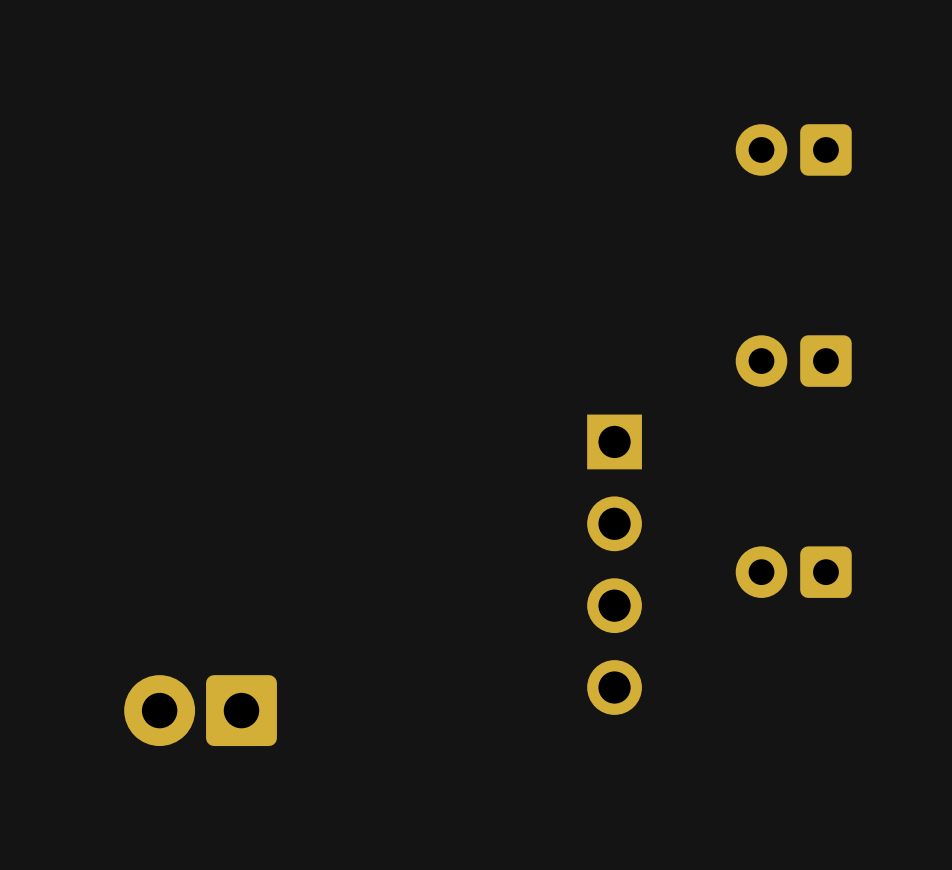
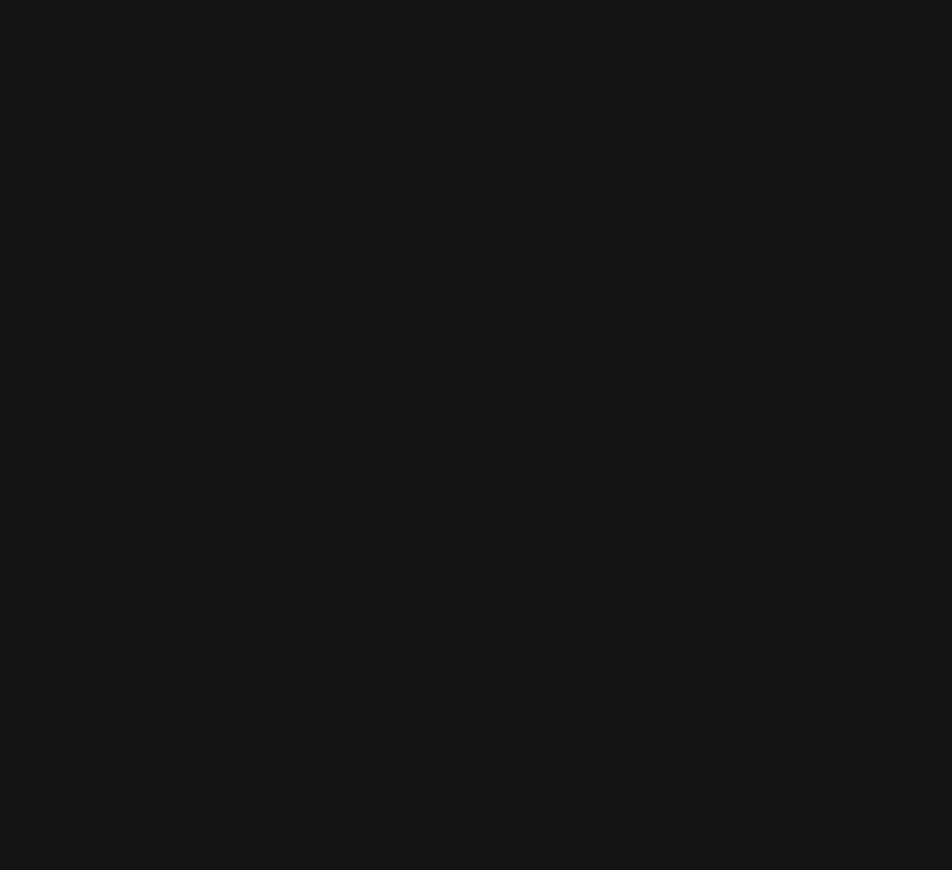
part: (793, 149) -> none
part: (793, 361) -> none
part: (614, 564) -> none
part: (793, 572) -> none
part: (200, 710) -> none

